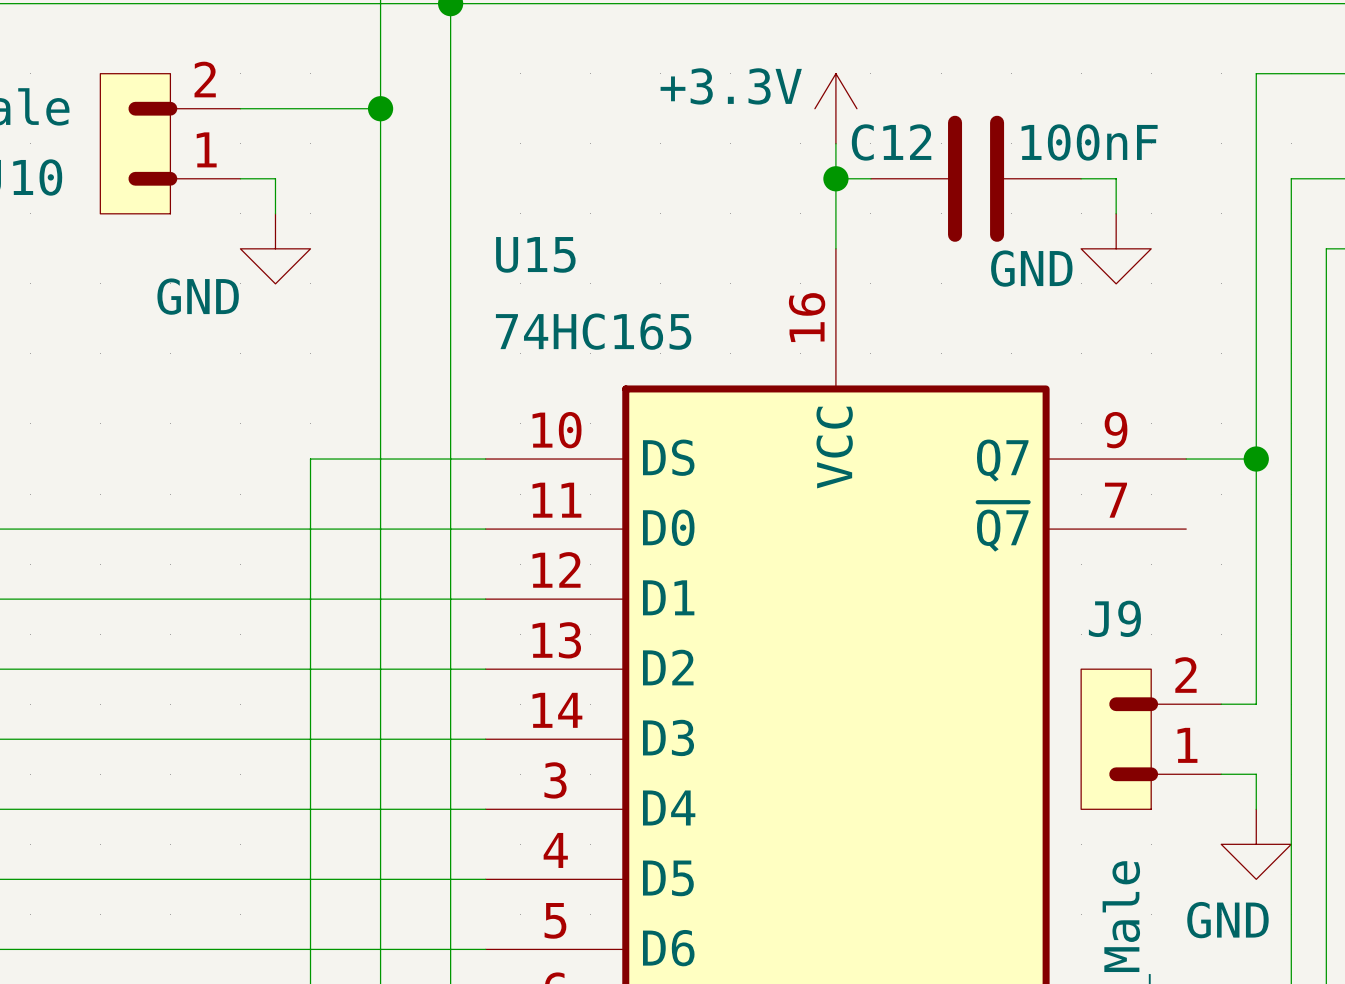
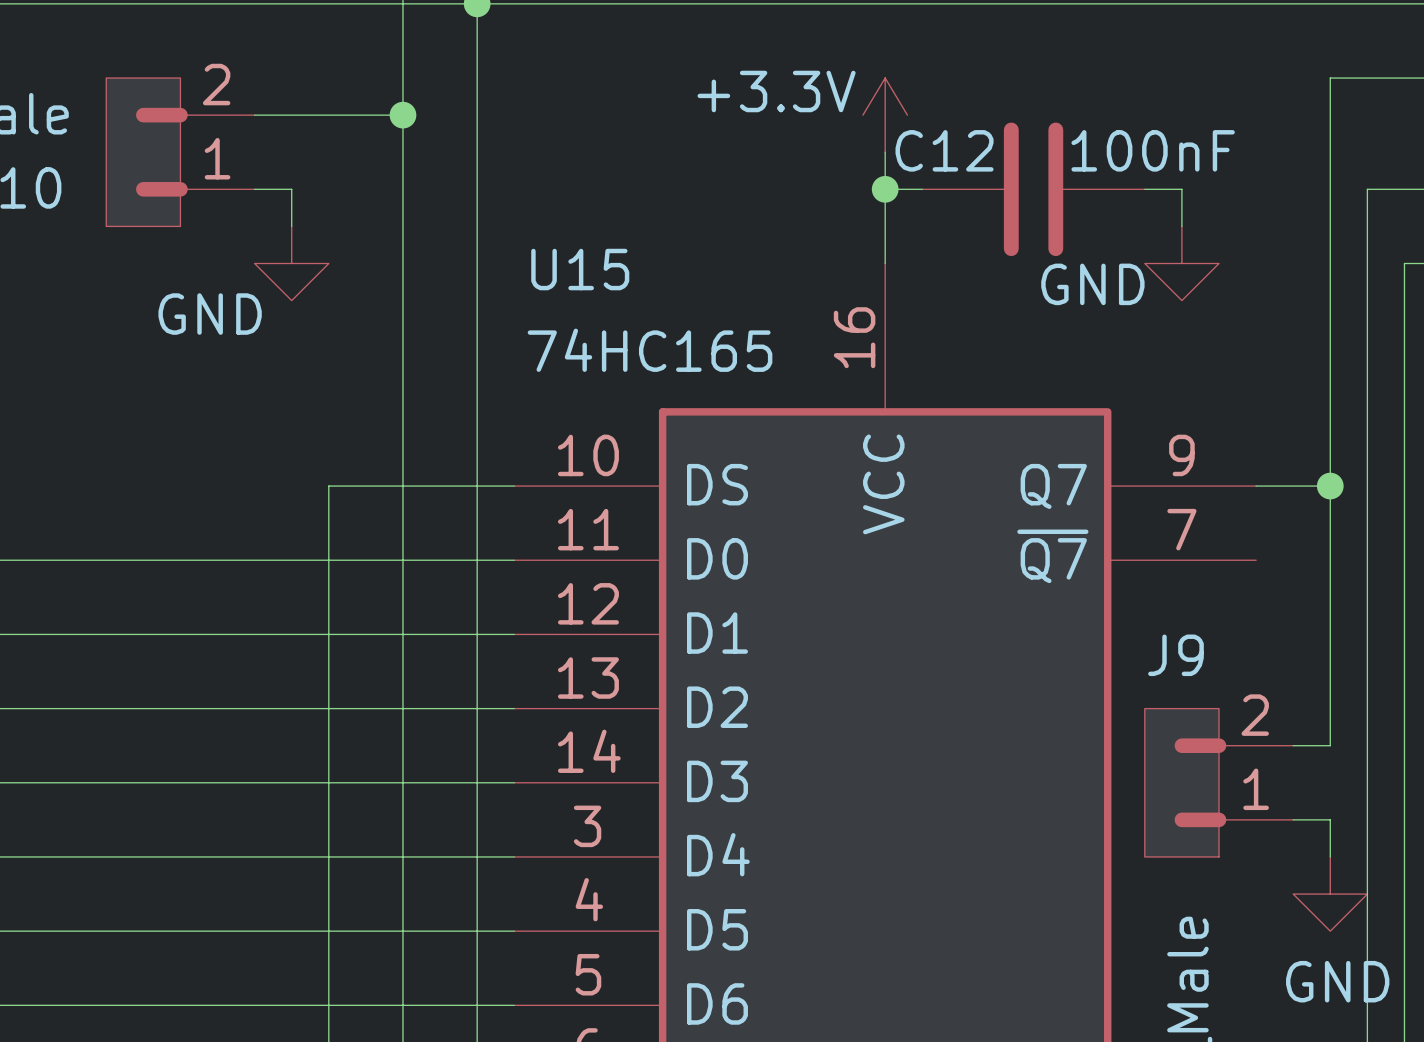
power symbol text position: GND (1227, 920) -> GND (1337, 981)

